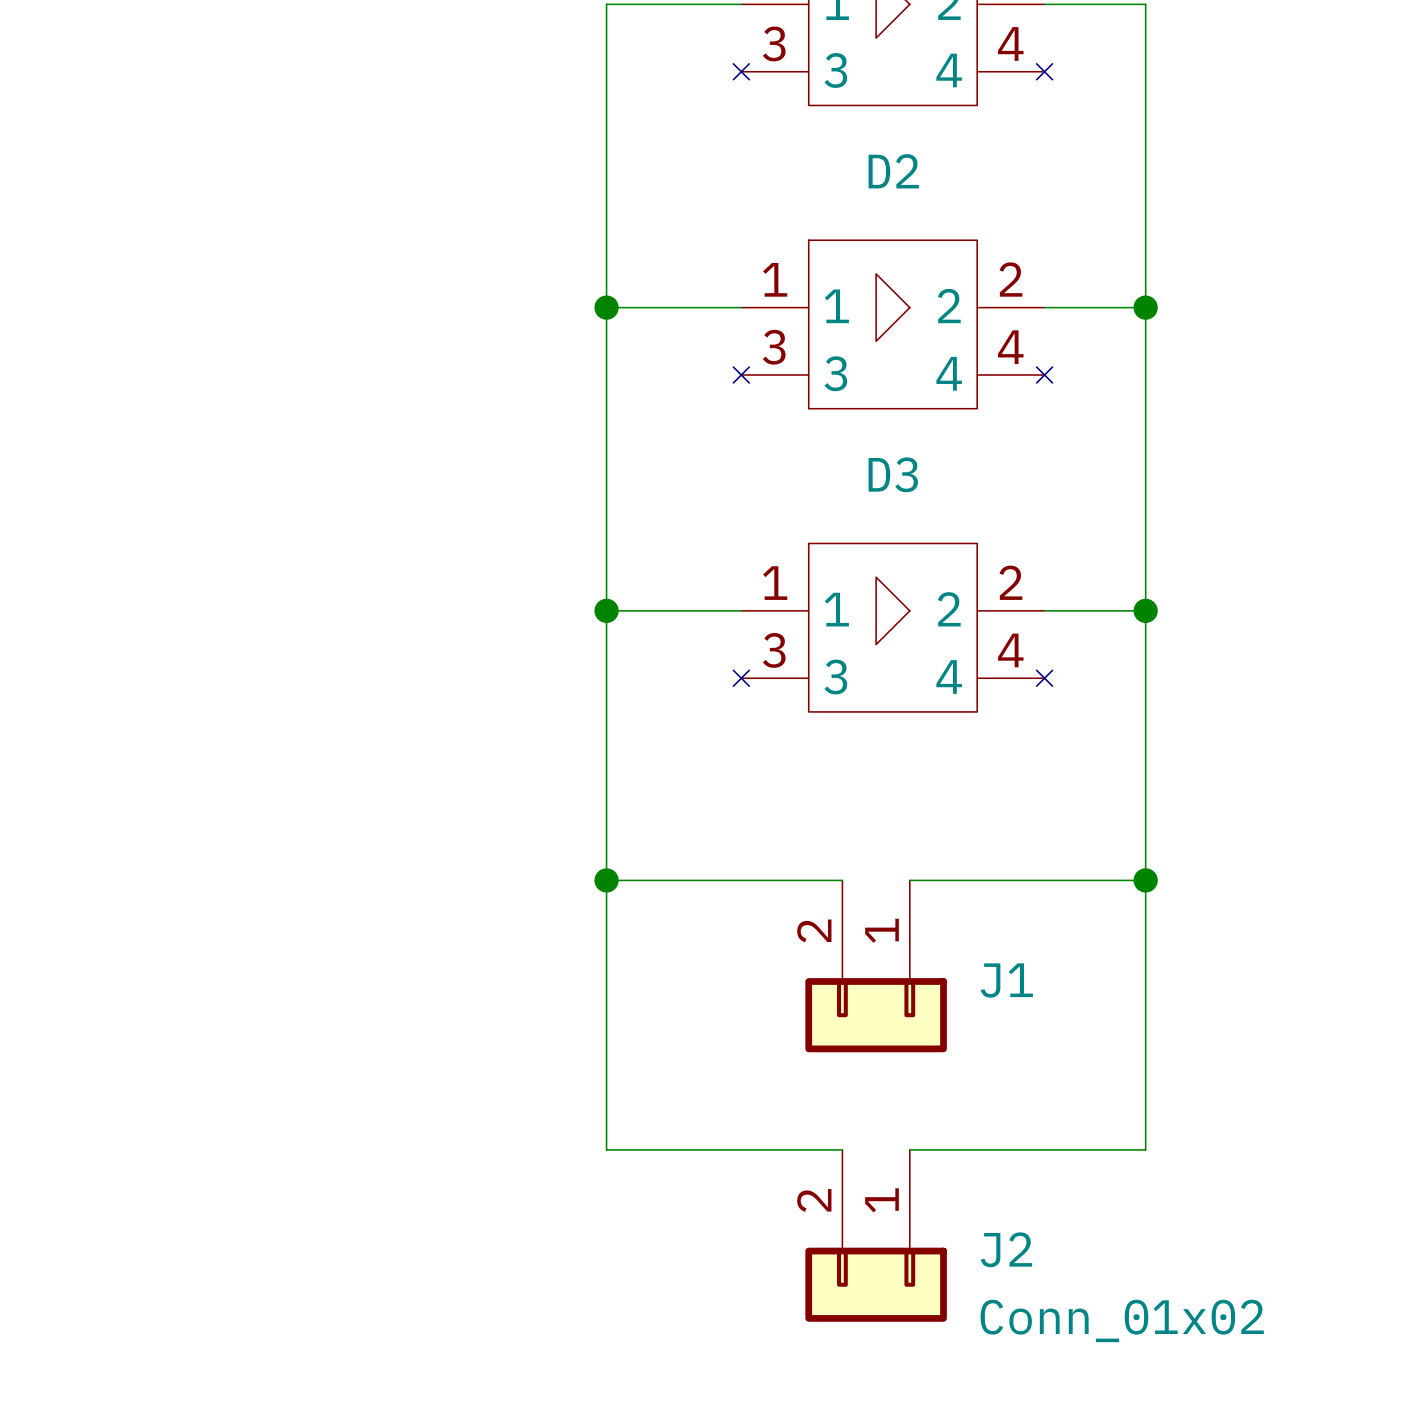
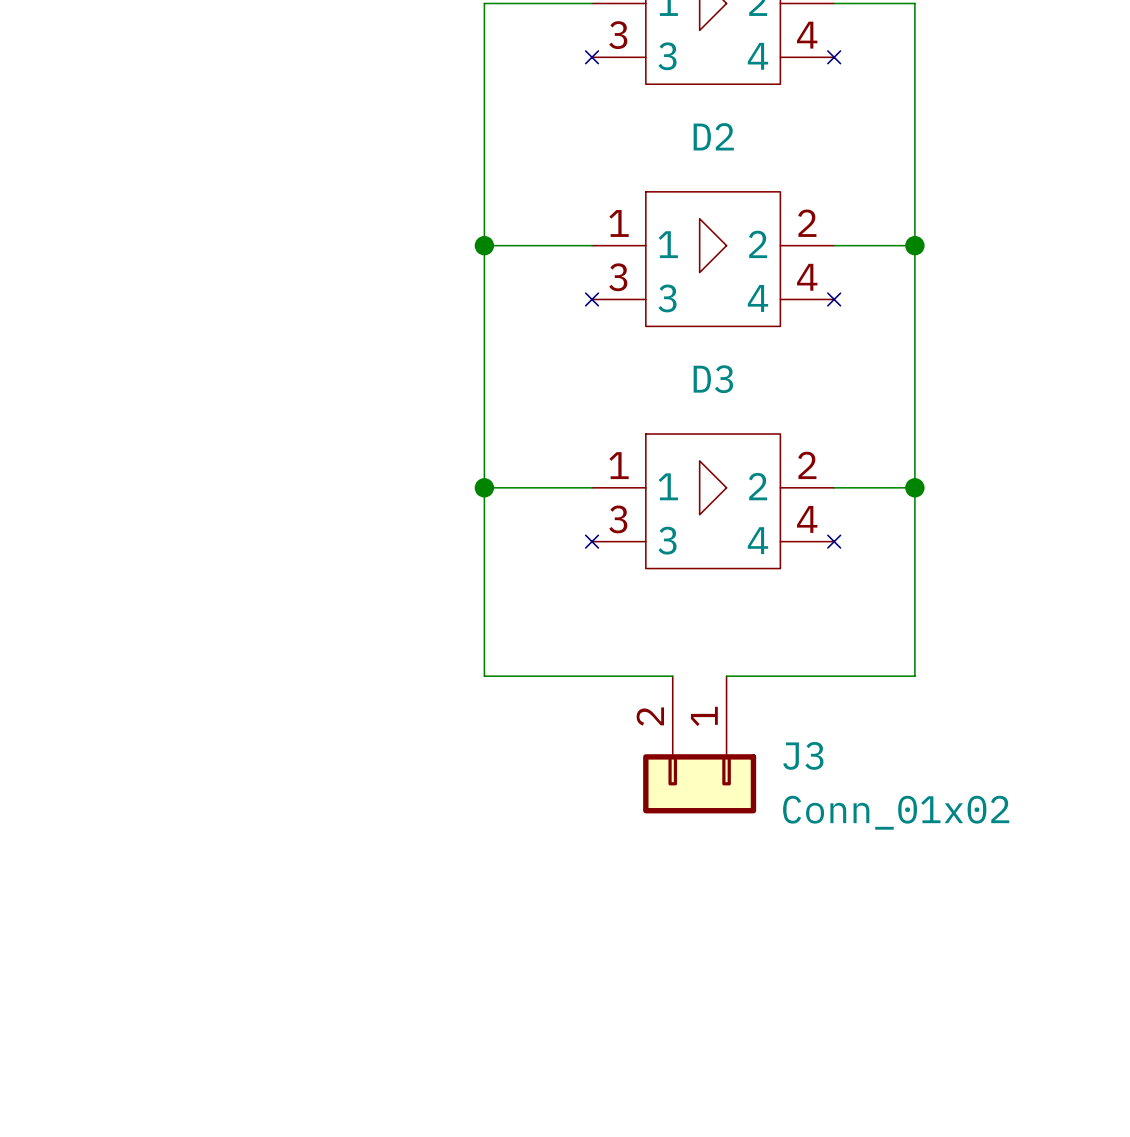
wire: (606, 846) (606, 1149) (842, 1149) -> (484, 676) (672, 676)
wire: (1145, 846) (1145, 1149) (909, 1149) -> (914, 676) (726, 676)
wire: (606, 880) (842, 880) -> none
junction: (606, 880) -> none
wire: (909, 880) (1145, 880) -> none
junction: (1145, 880) -> none
J3: none -> Conn_01x02 (699, 744)
J1: (876, 966) -> none
J2: Conn_01x02 (876, 1235) -> none

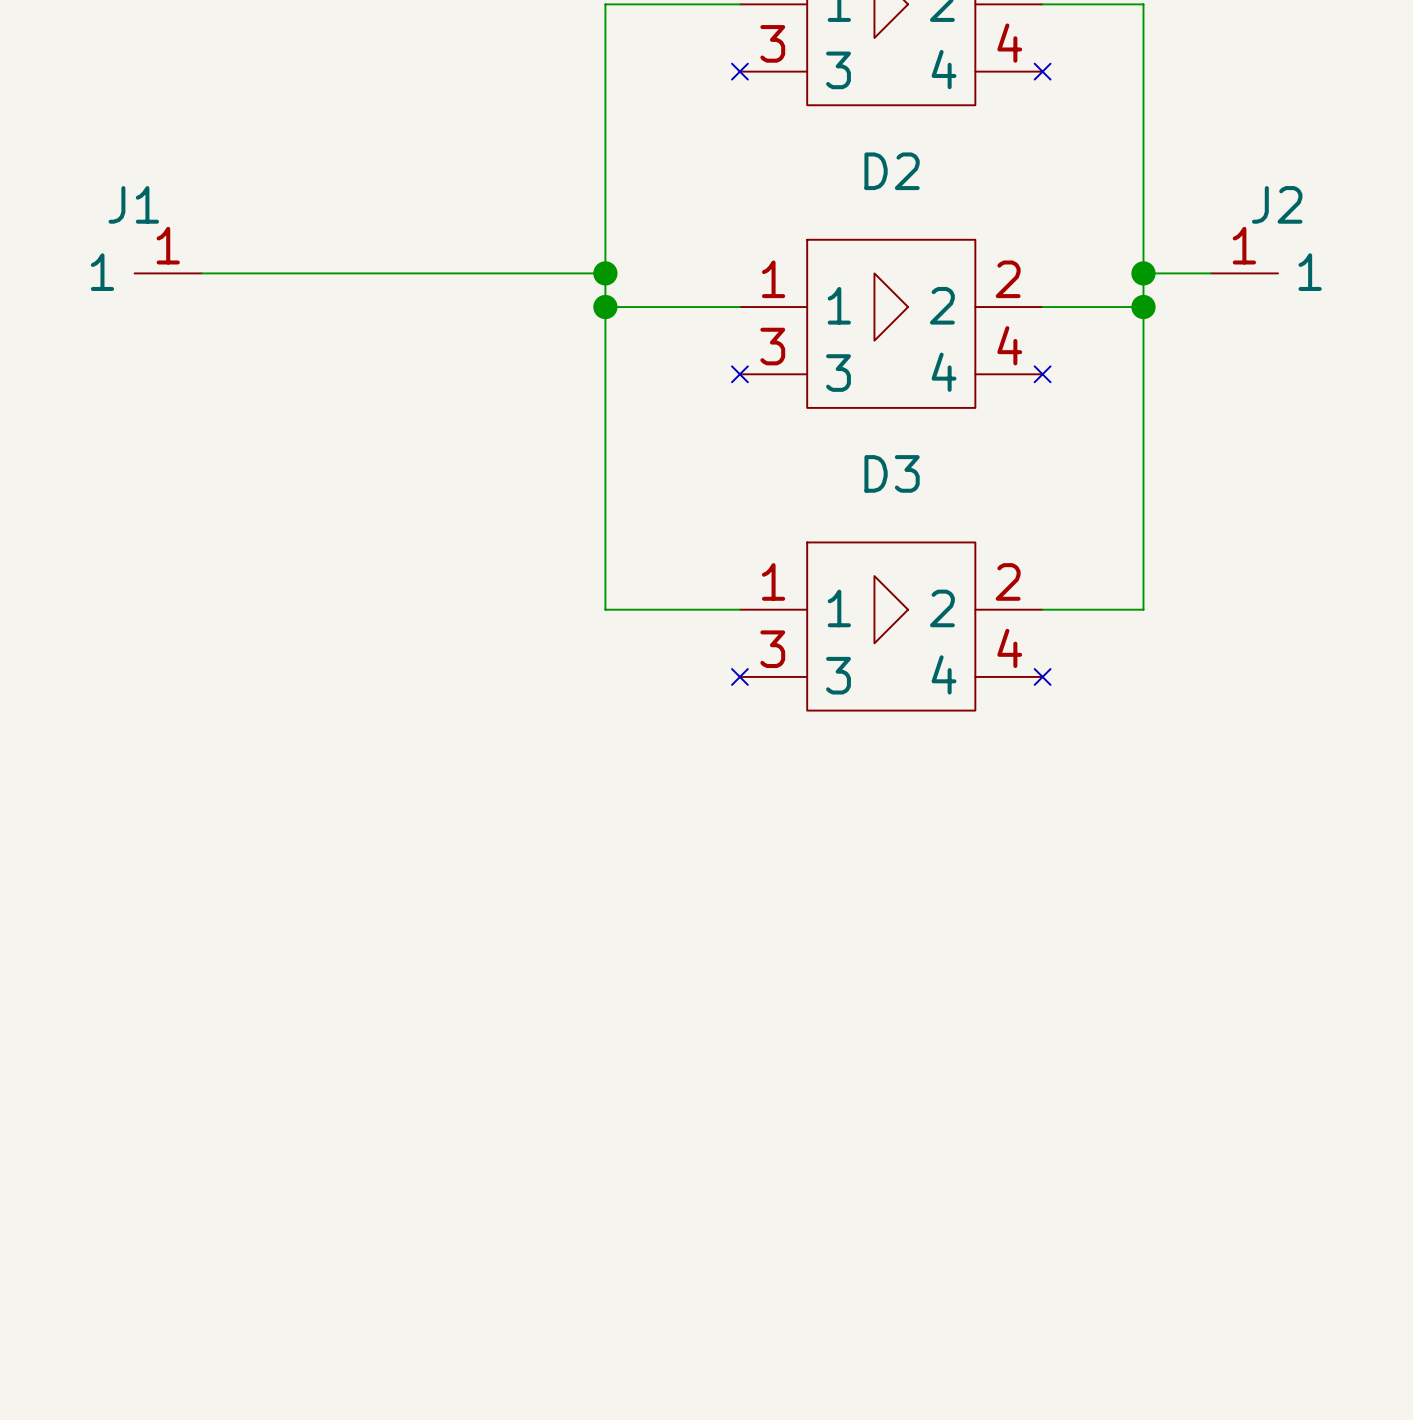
J1: none -> (168, 273)
wire: none -> (201, 273) (605, 273)
junction: none -> (605, 273)
wire: none -> (1143, 273) (1210, 273)
junction: none -> (1143, 273)
J2: none -> (1244, 273)
wire: (484, 487) (484, 676) (672, 676) -> none
junction: (484, 487) -> none
wire: (914, 487) (914, 676) (726, 676) -> none
junction: (914, 487) -> none
J3: Conn_01x02 (699, 744) -> none

